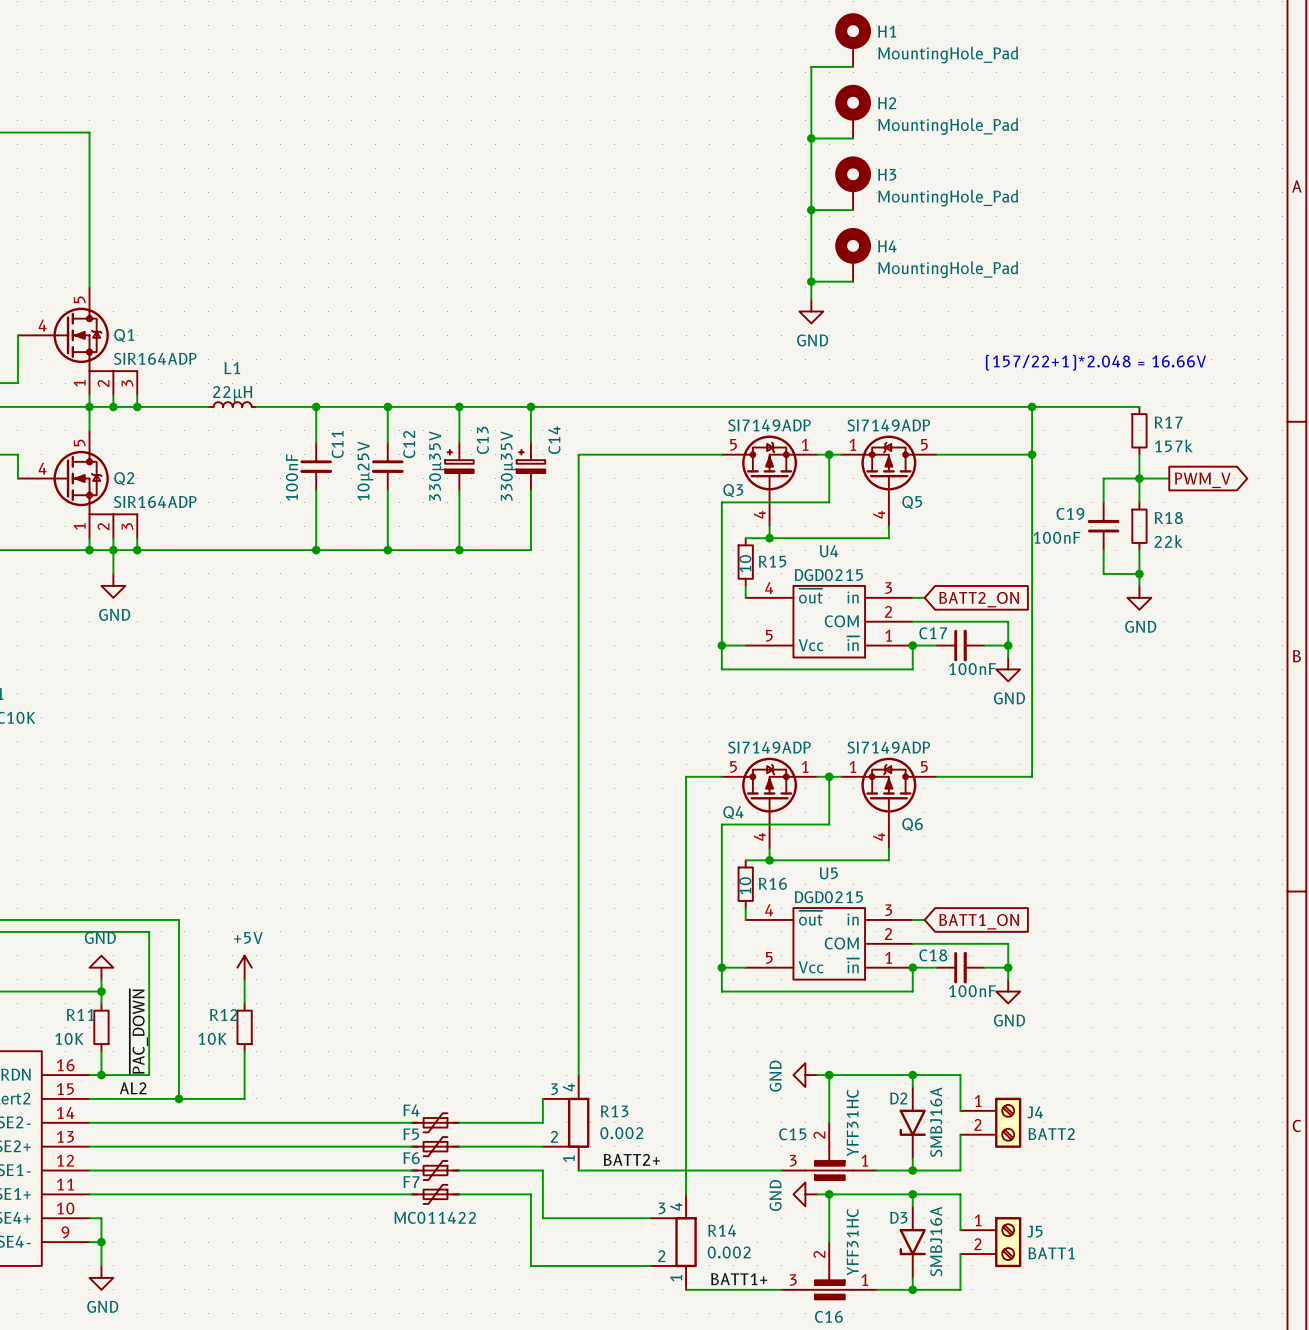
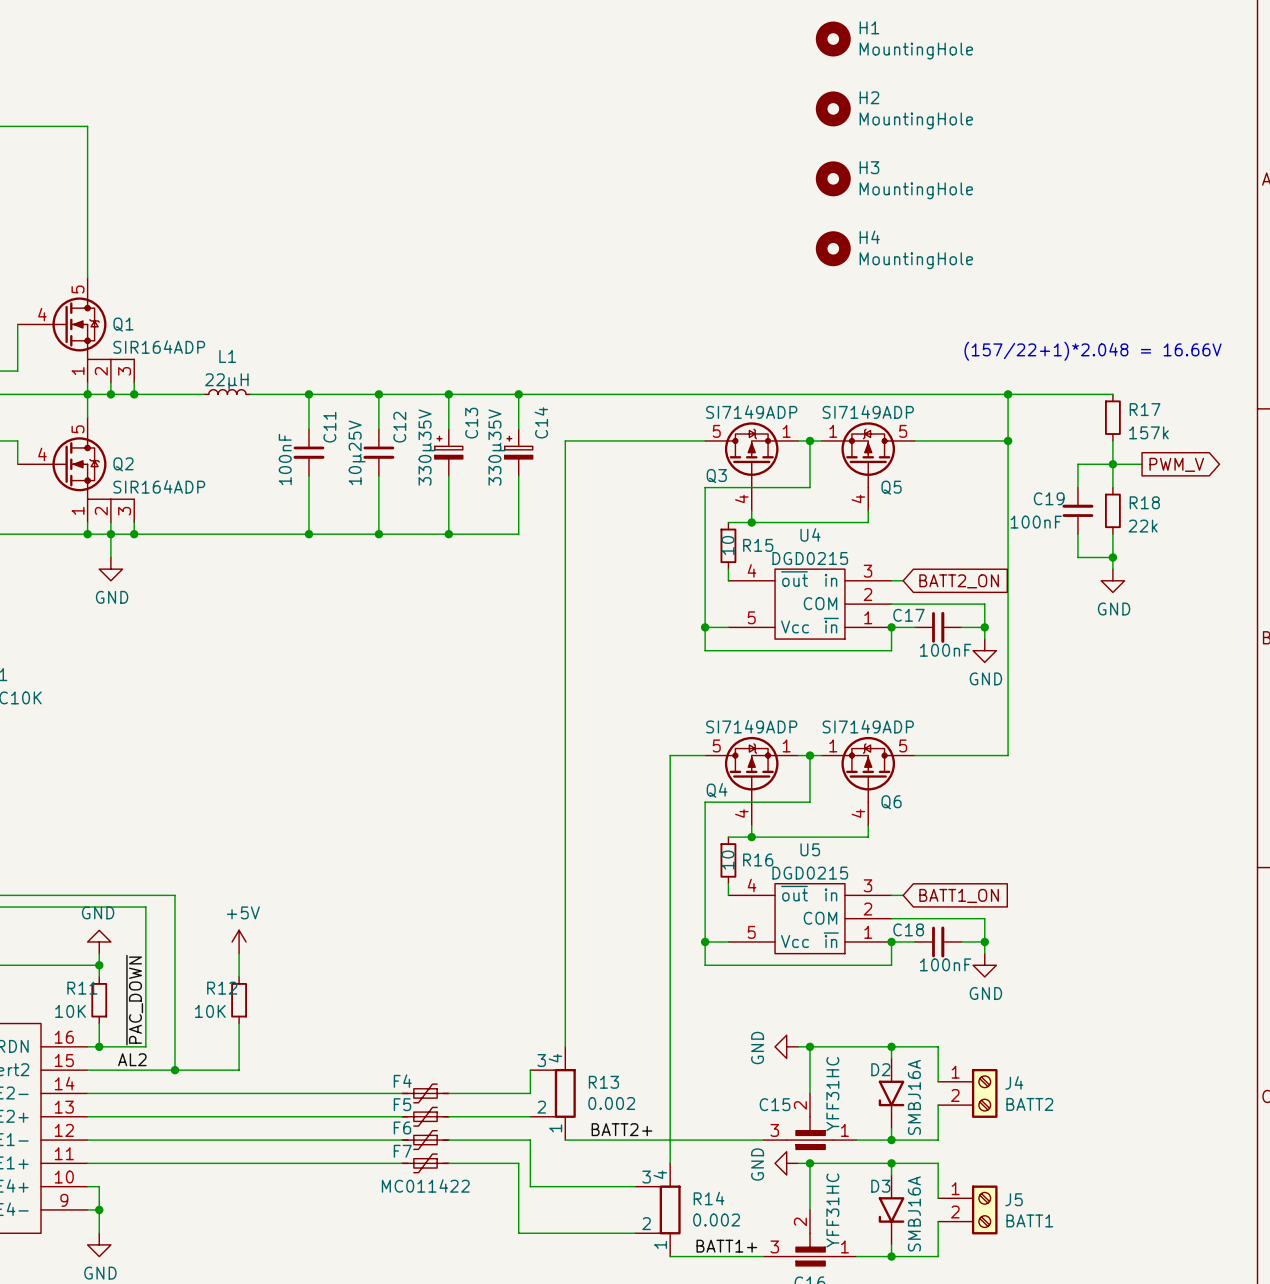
H1 symbol: [835, 13, 871, 67] -> [815, 21, 851, 57]
H1 value: MountingHole_Pad (948, 54) -> MountingHole (916, 51)
wire: (853, 66) (811, 66) (811, 299) -> none
H2 symbol: [835, 84, 871, 139] -> [815, 91, 851, 127]
H2 value: MountingHole_Pad (948, 126) -> MountingHole (916, 120)
wire: (811, 138) (853, 138) -> none
junction: (811, 138) -> none
H3 symbol: [835, 156, 871, 211] -> [815, 161, 851, 197]
H3 value: MountingHole_Pad (948, 198) -> MountingHole (916, 190)
wire: (811, 210) (853, 210) -> none
junction: (811, 210) -> none
H4 symbol: [835, 227, 871, 282] -> [815, 231, 851, 267]
H4 value: MountingHole_Pad (948, 269) -> MountingHole (916, 260)
wire: (811, 281) (853, 281) -> none
junction: (811, 281) -> none
power symbol: GND (811, 311) -> none

